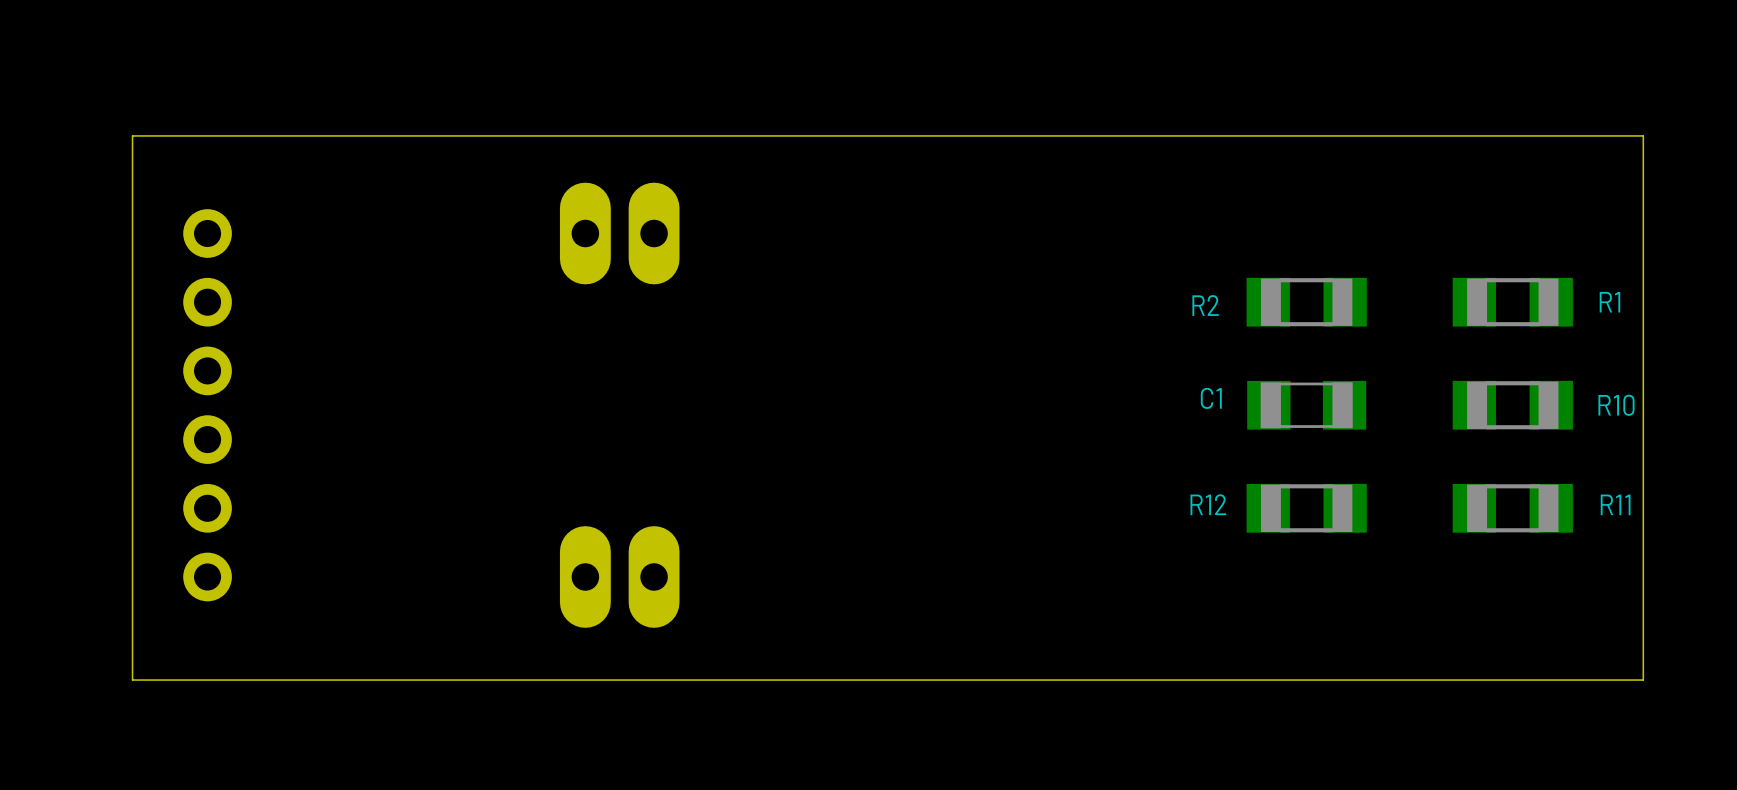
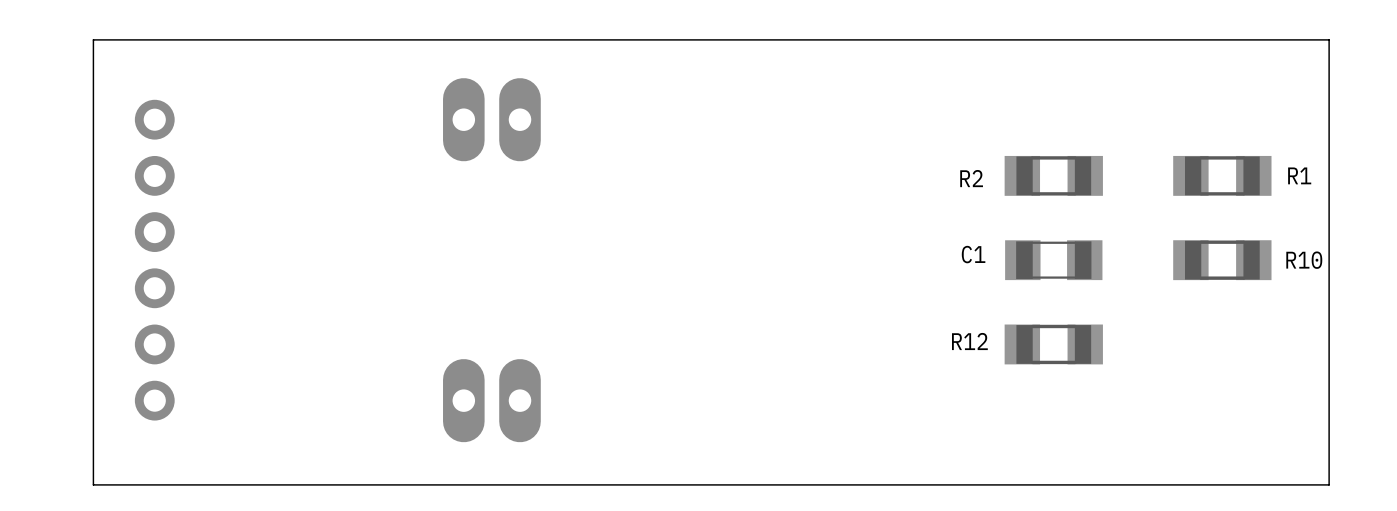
R11: (1512, 508) -> none

